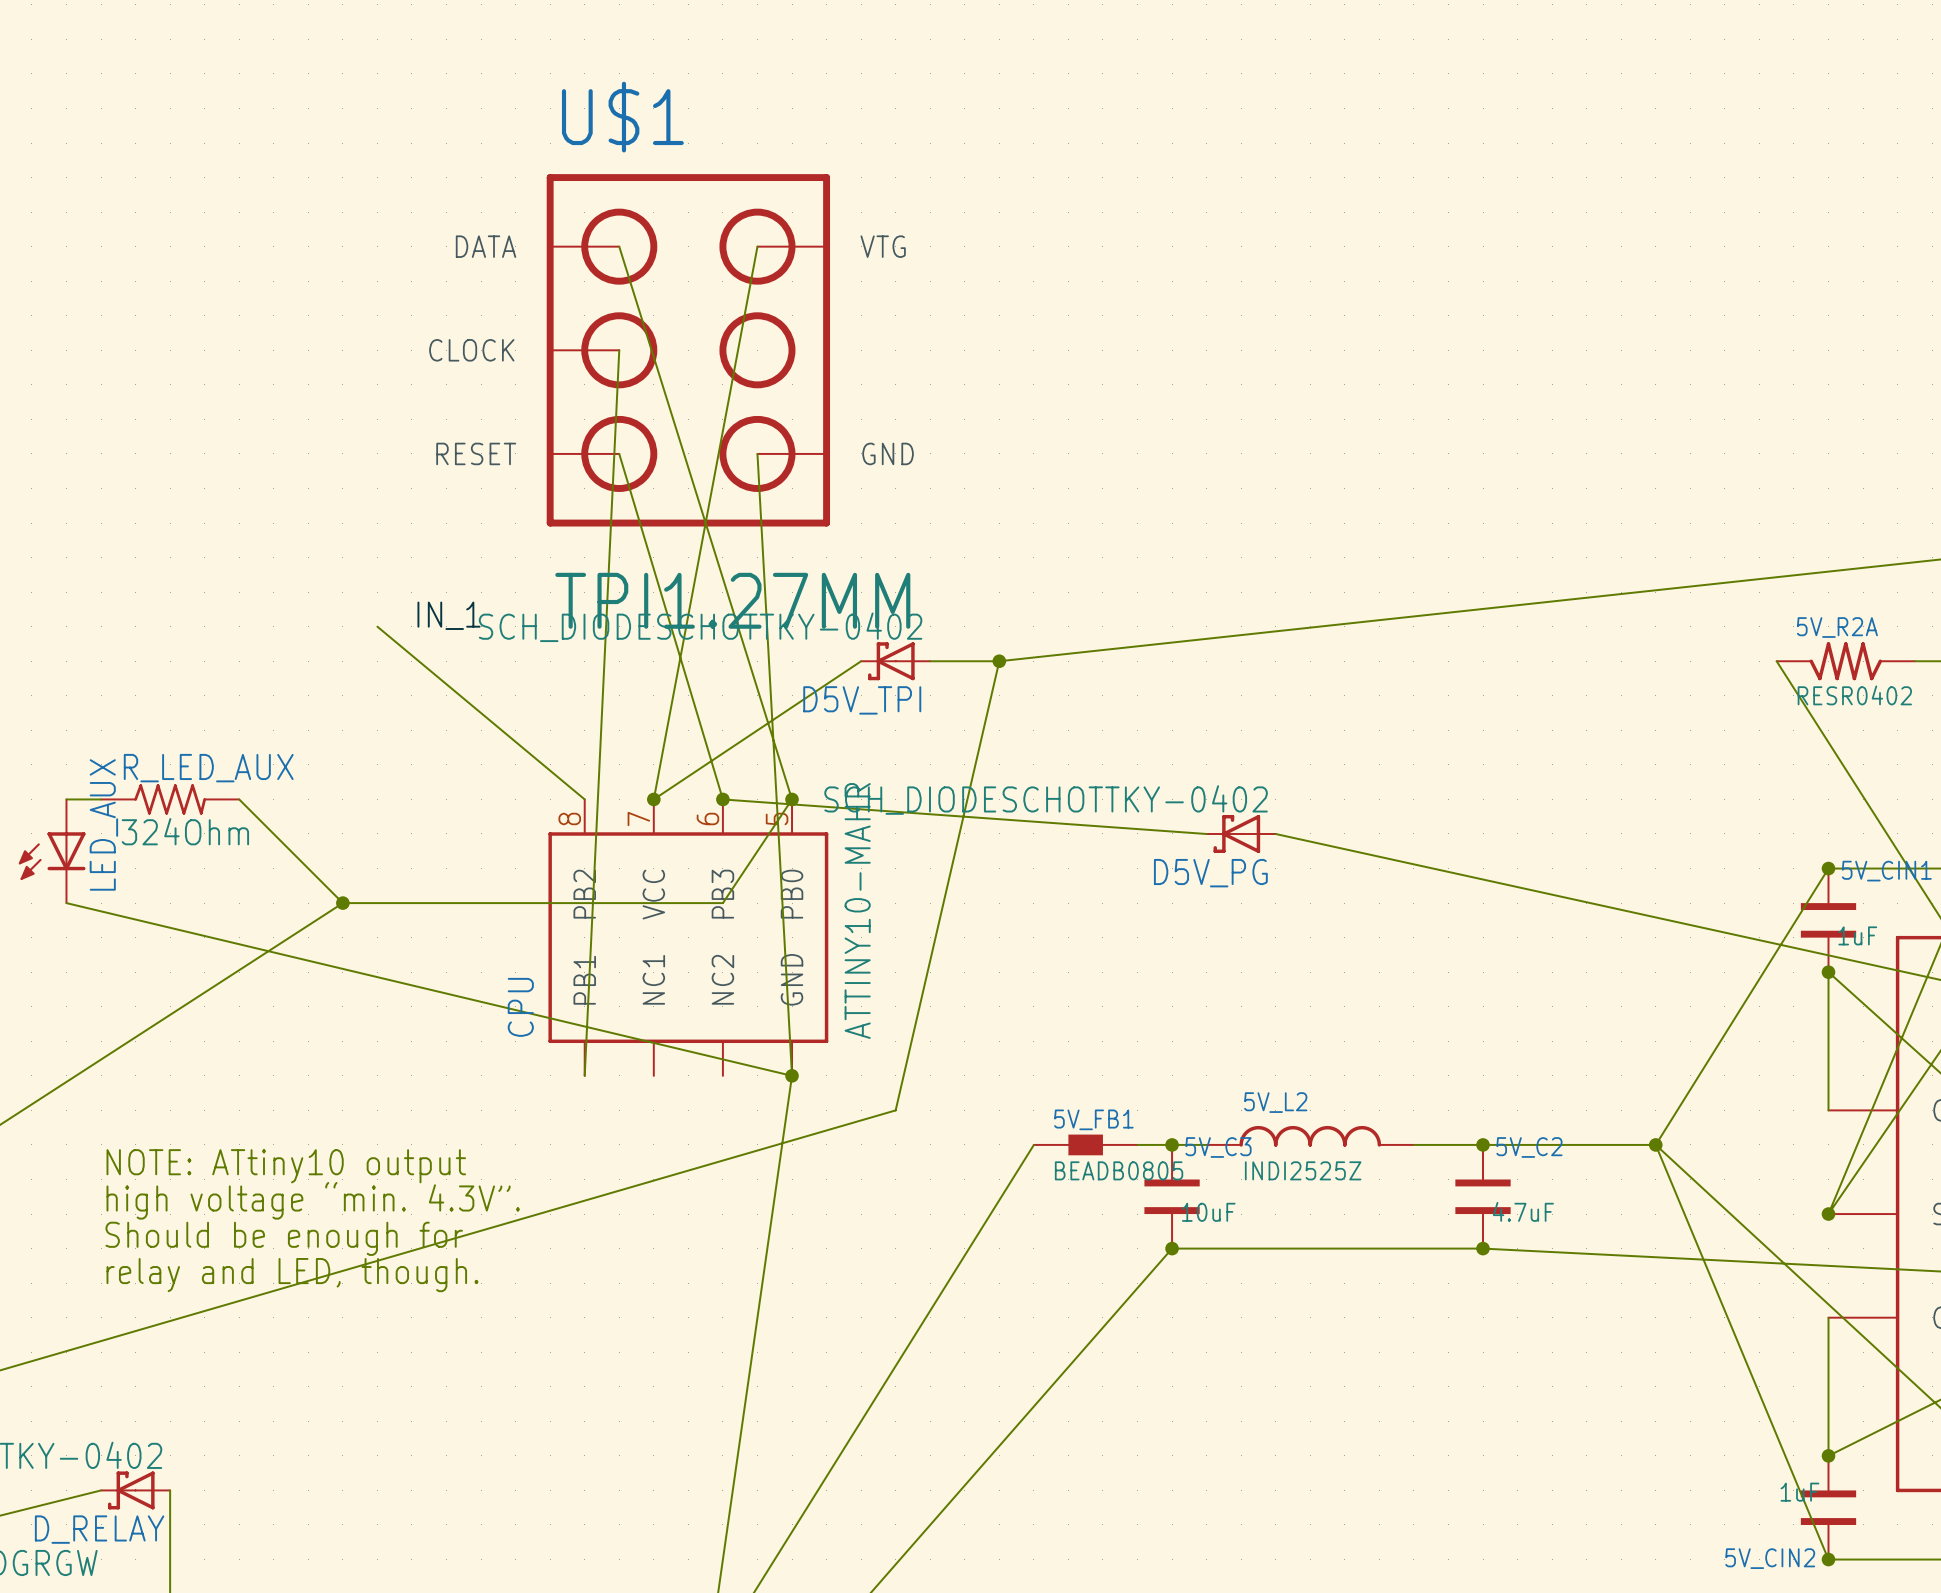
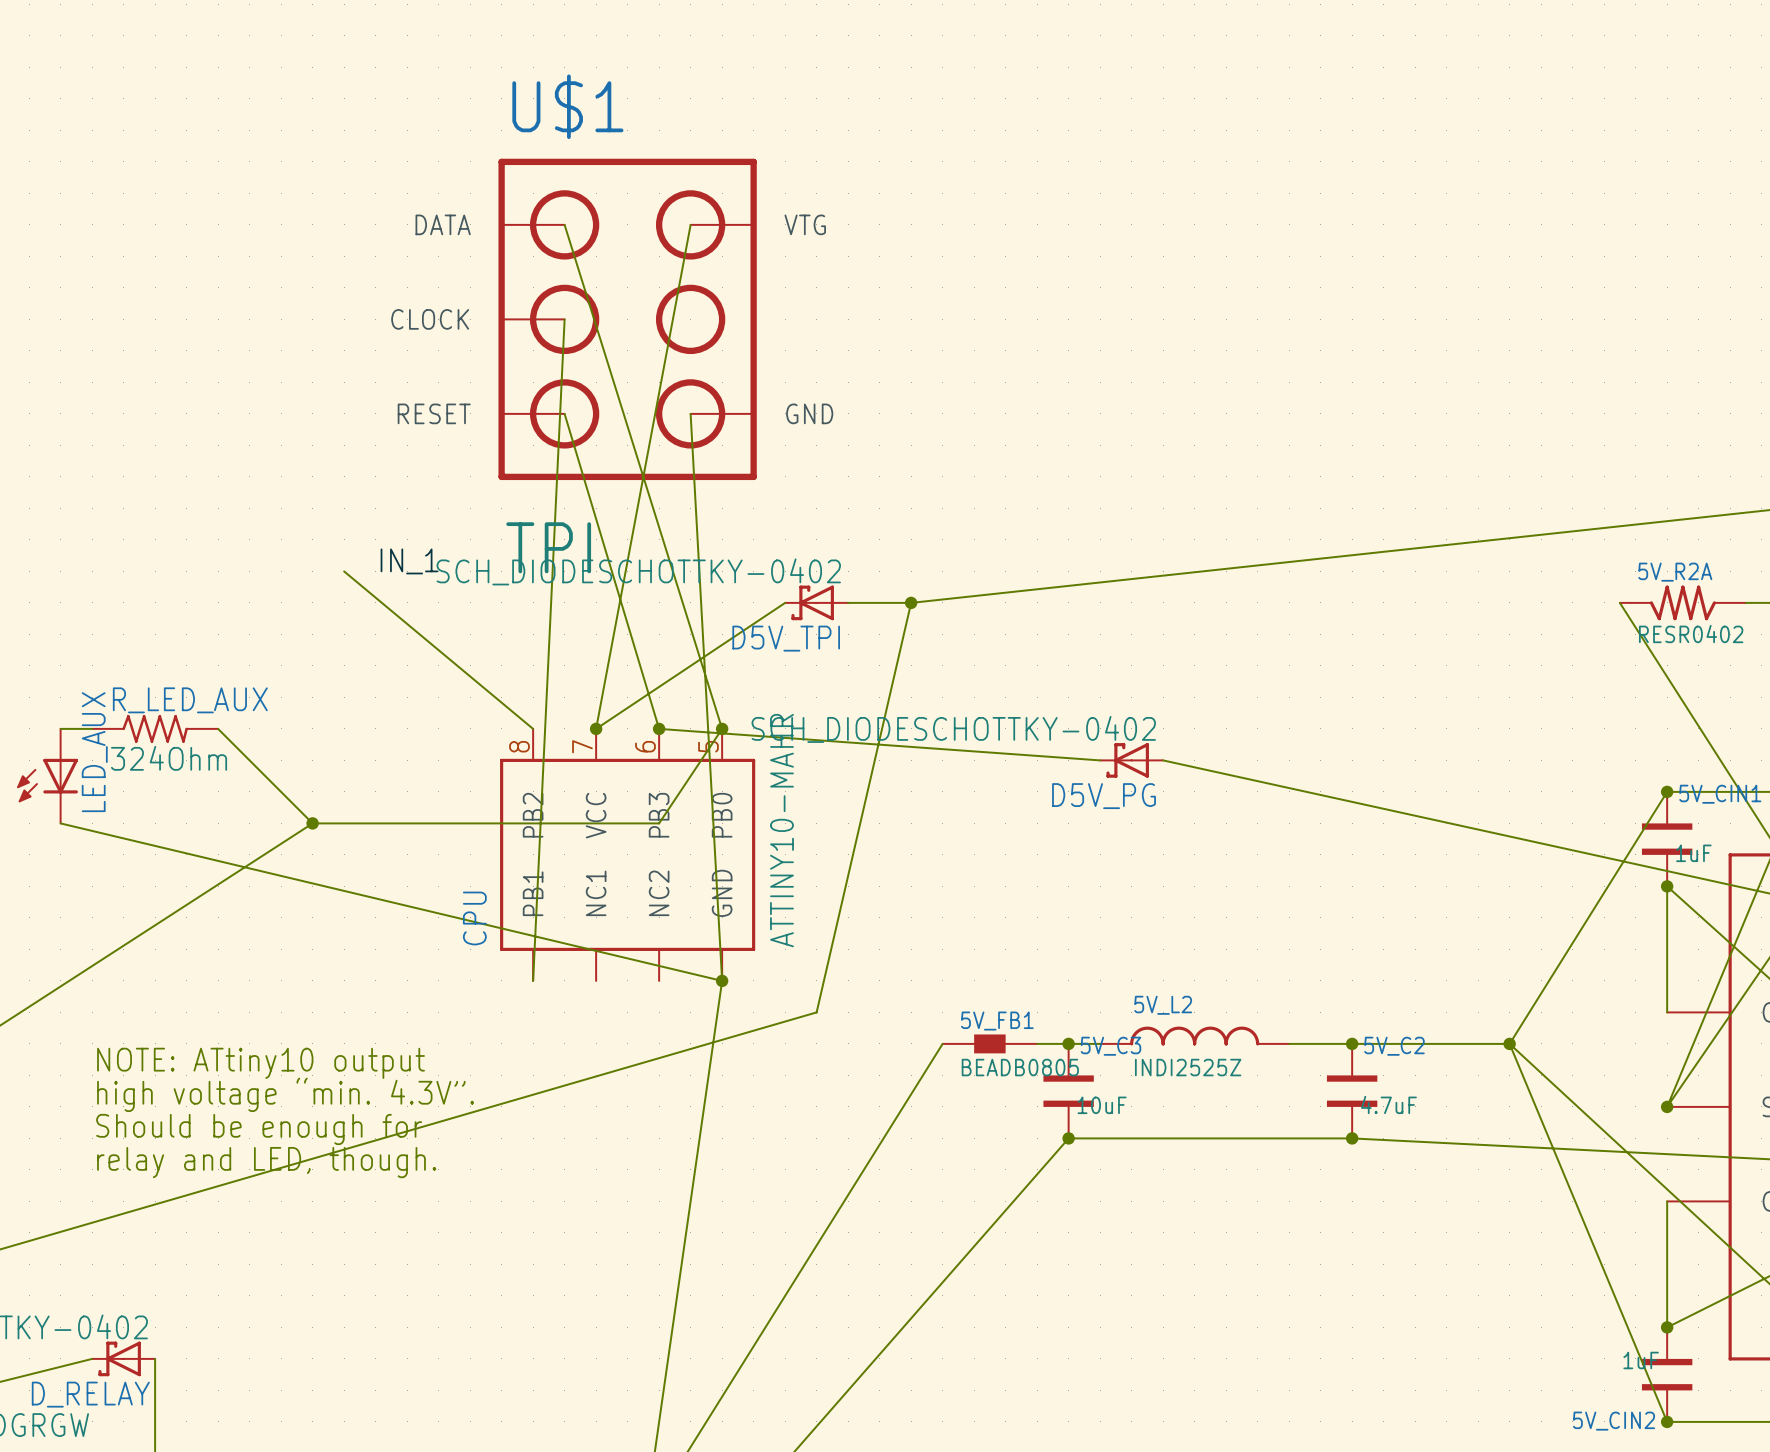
U$1 value: TPI1.27MM (732, 600) -> TPI (548, 547)

